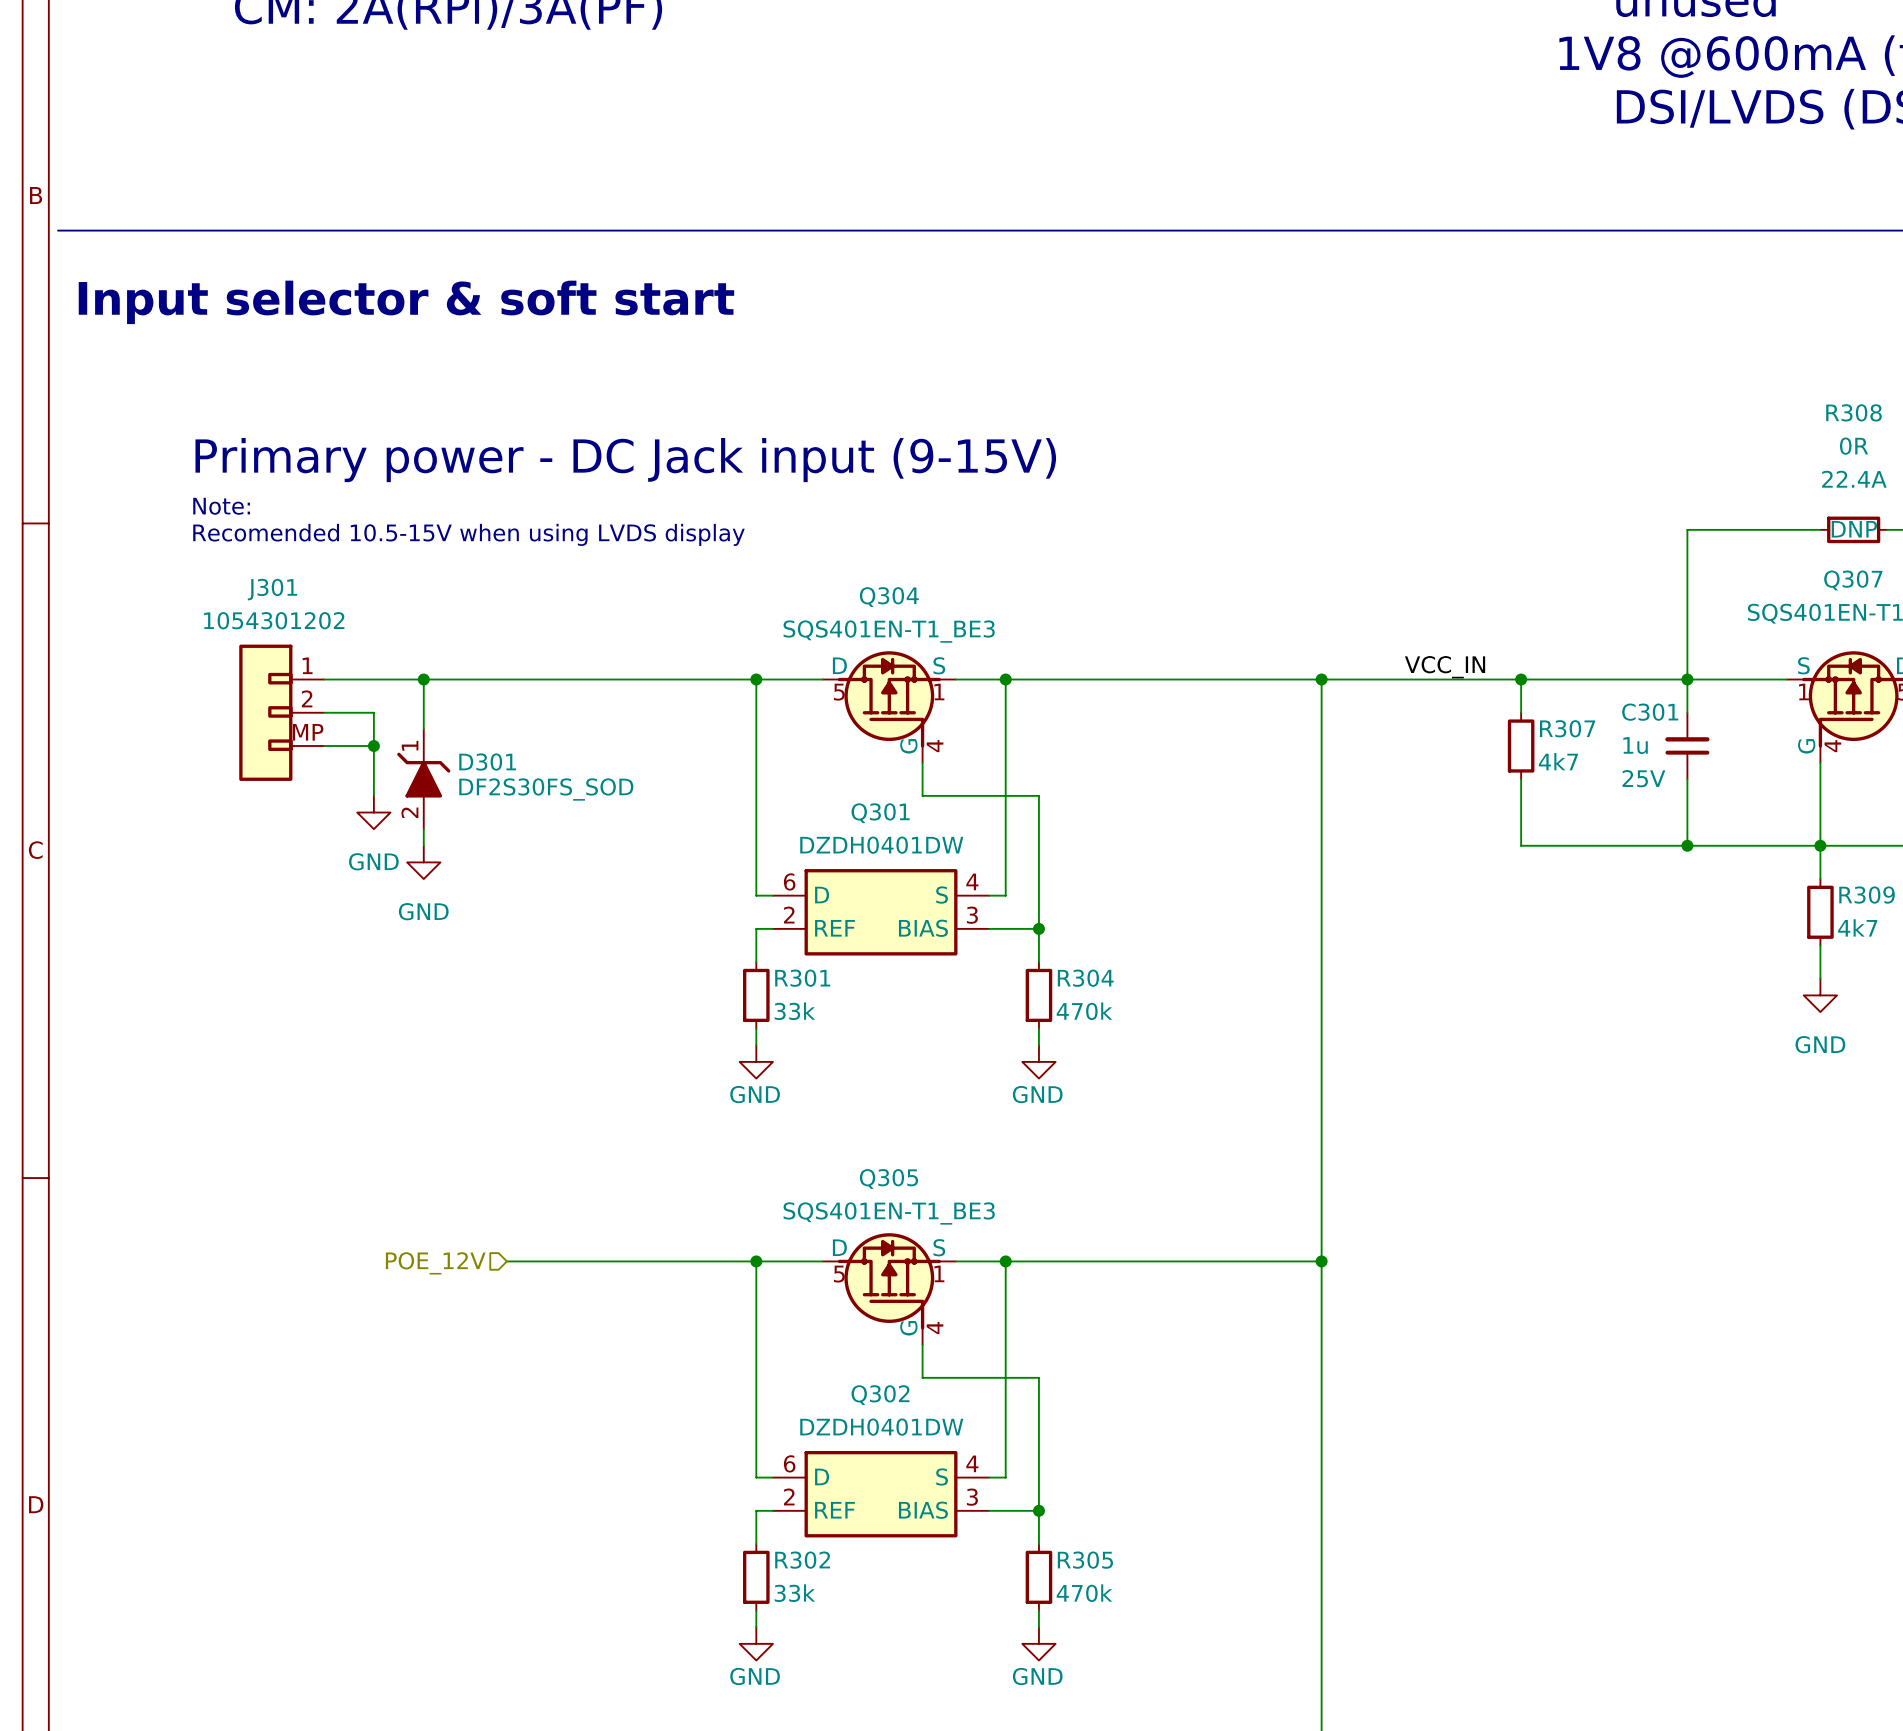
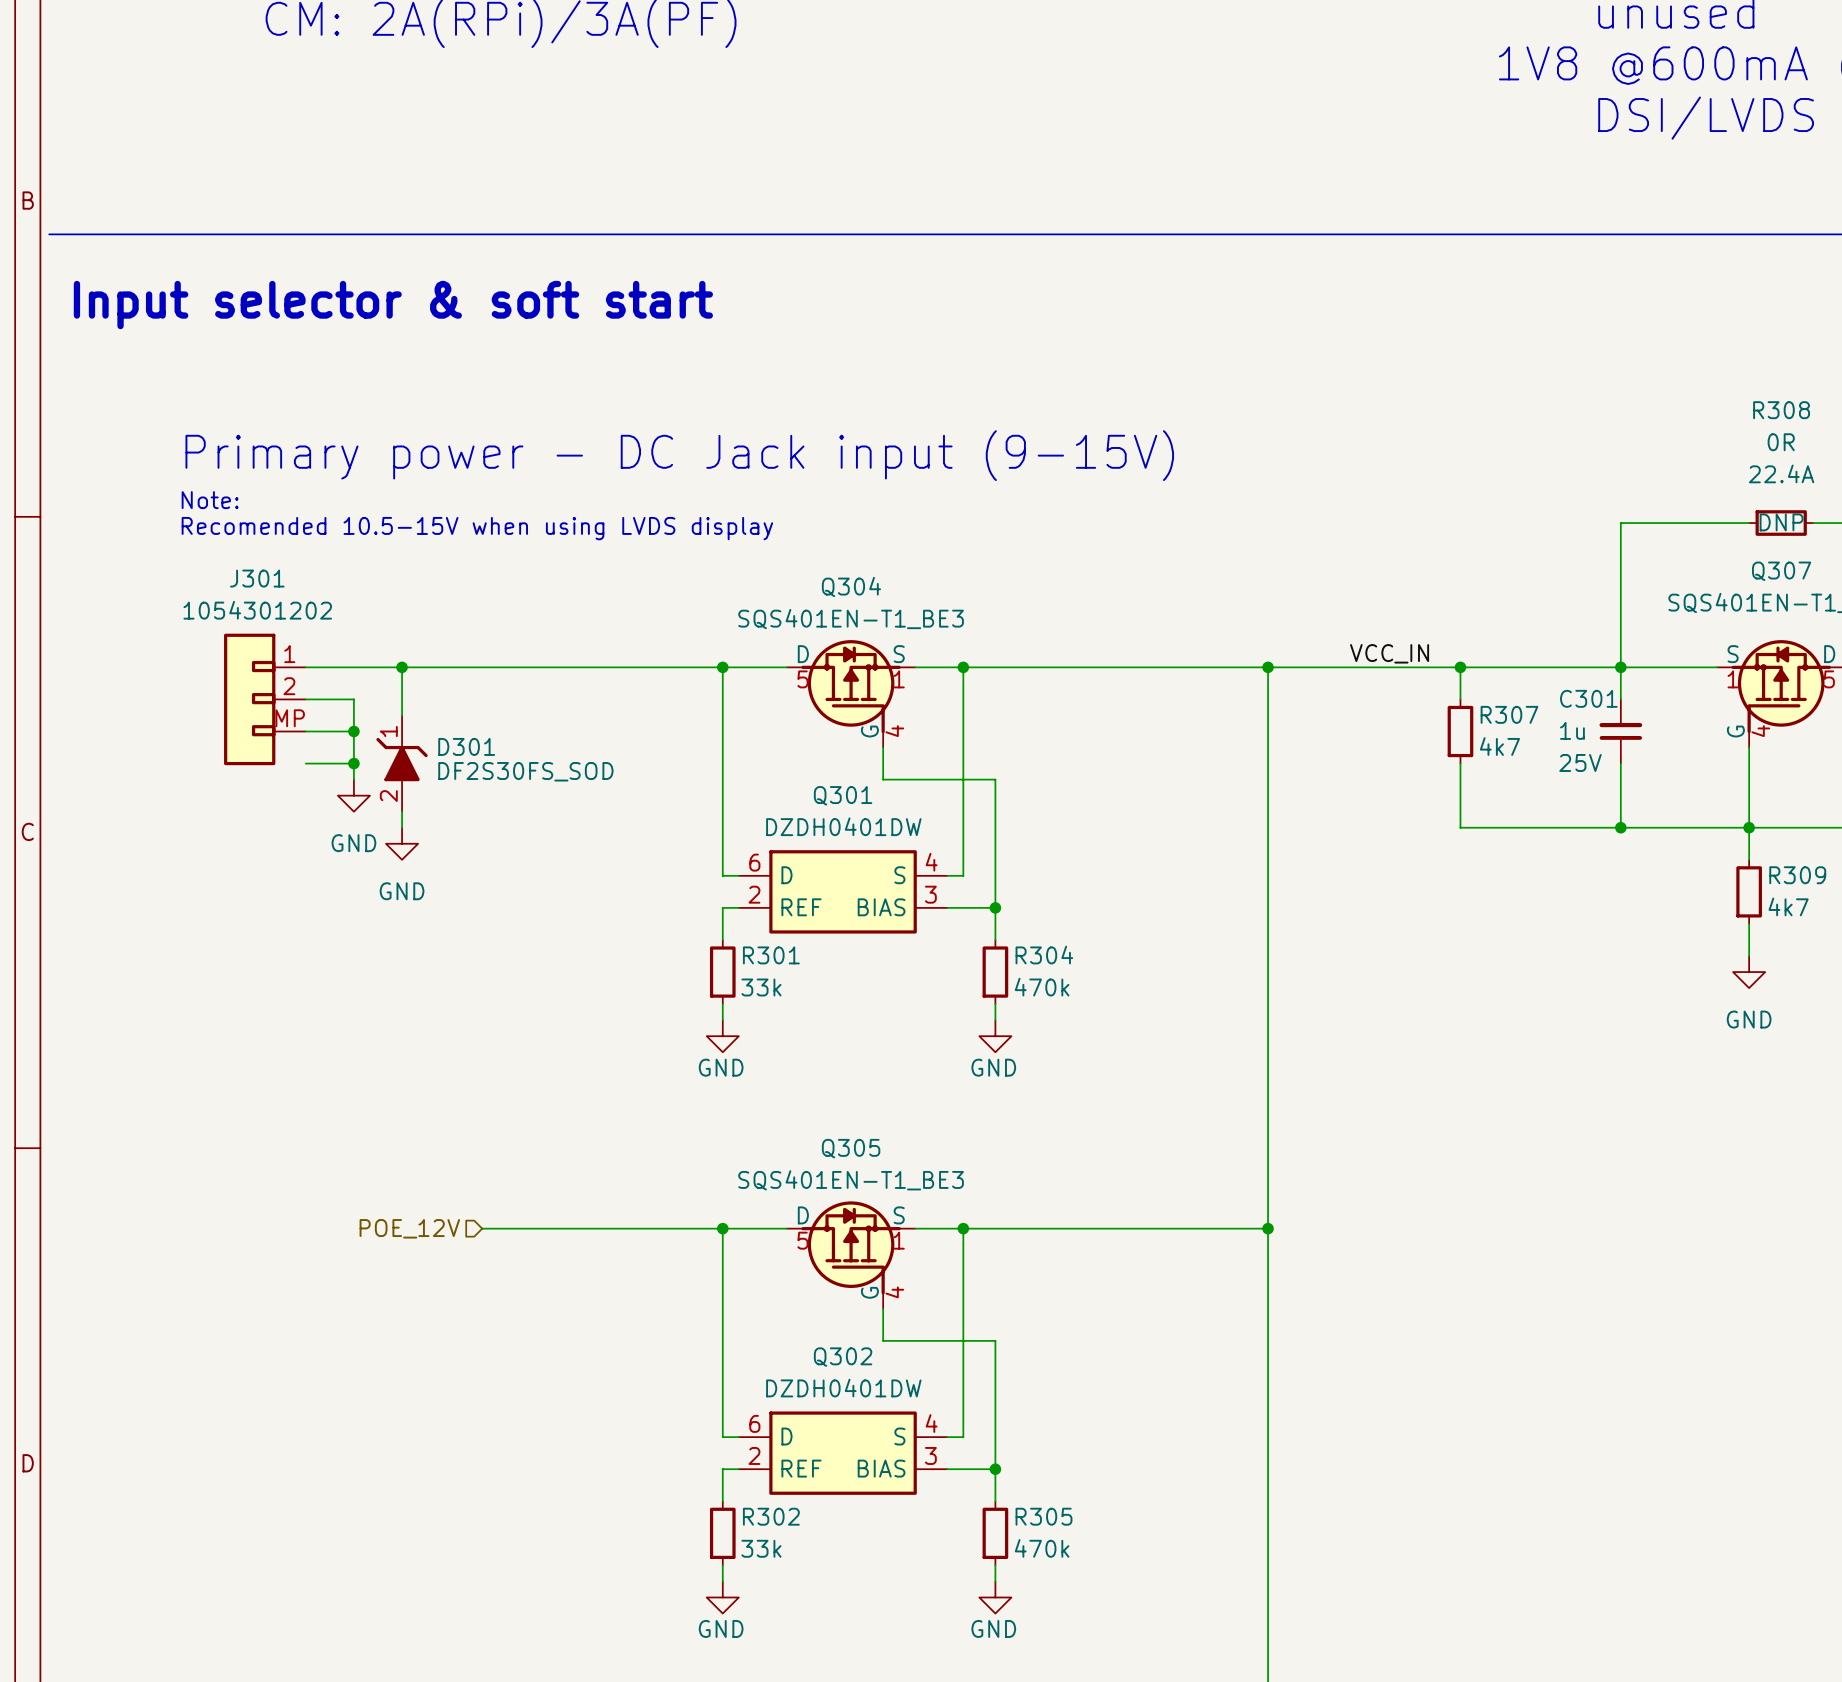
wire: none -> (305, 763) (353, 763)
junction: none -> (353, 763)

